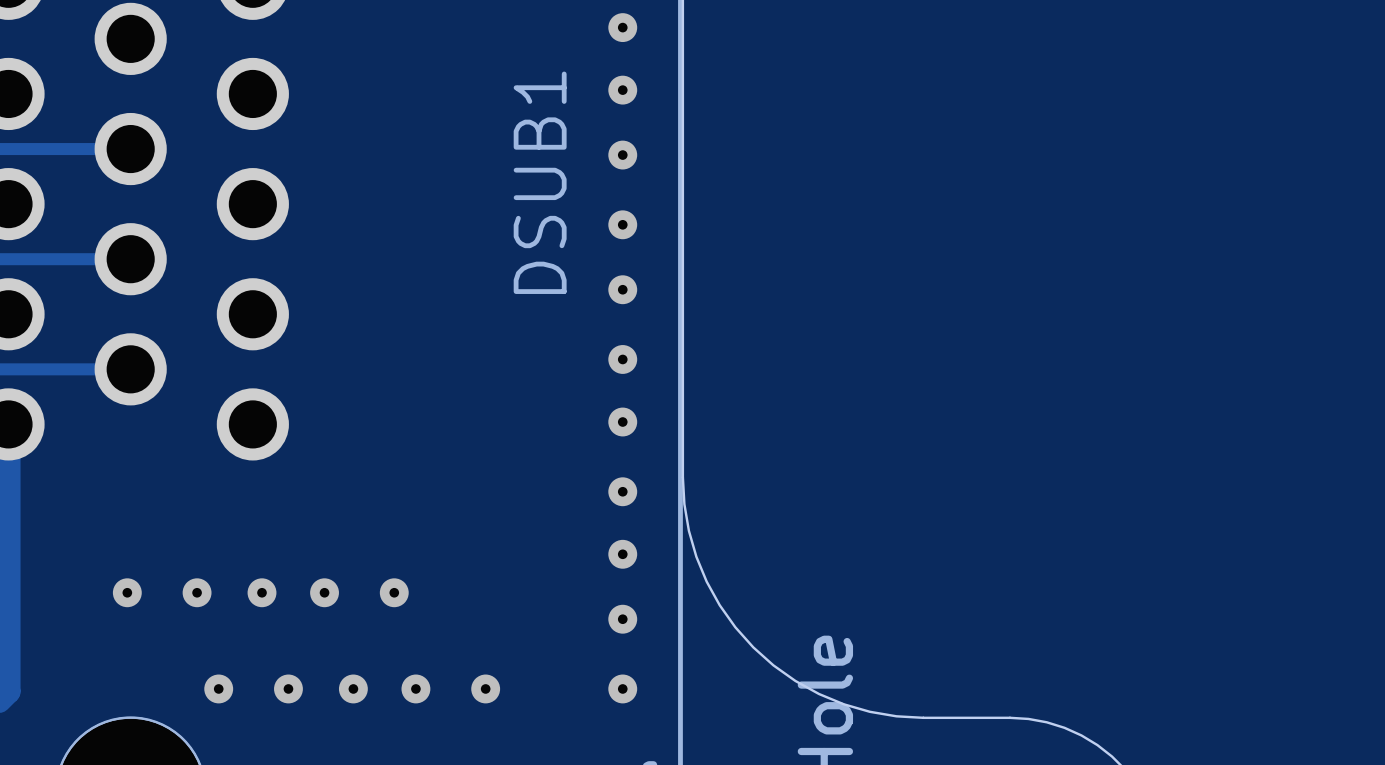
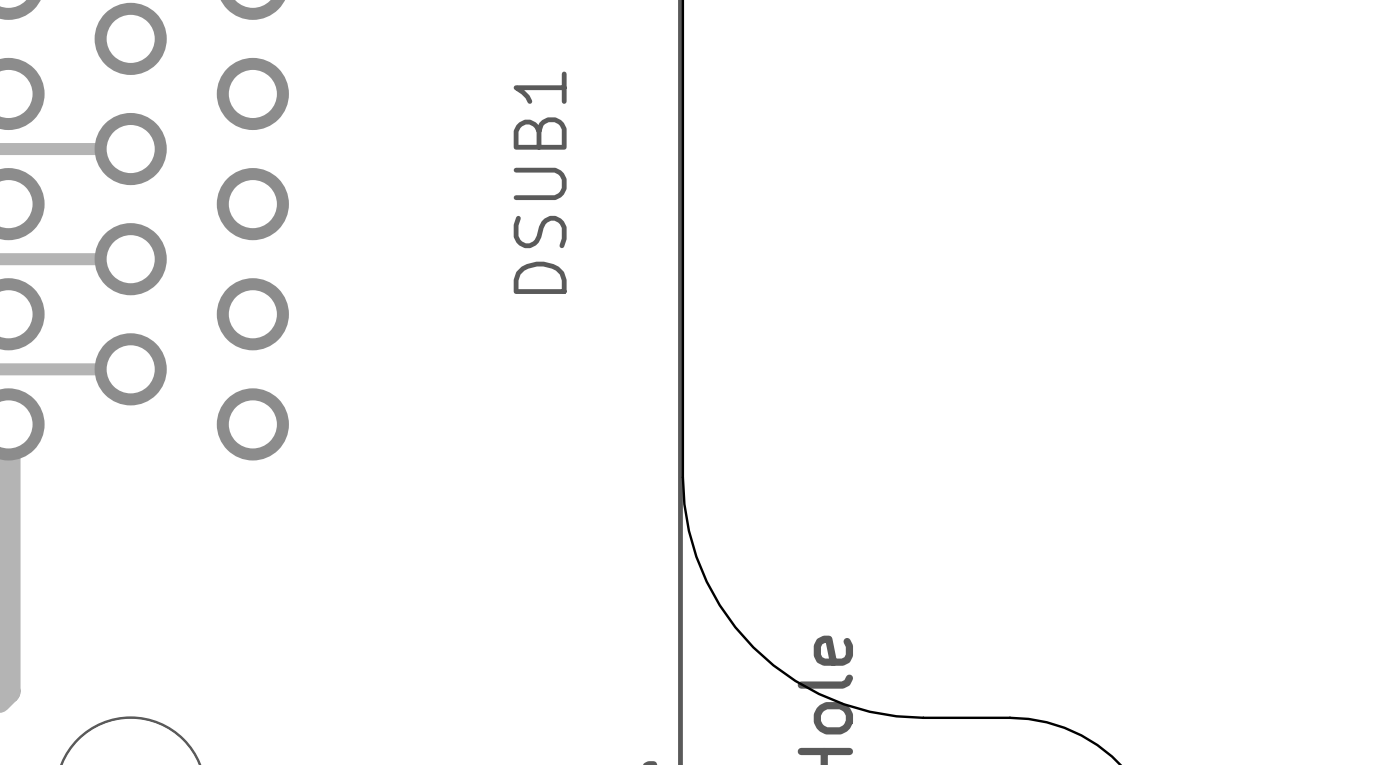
via: (622, 27) -> none
via: (622, 90) -> none
via: (622, 155) -> none
via: (622, 224) -> none
via: (622, 289) -> none
via: (622, 359) -> none
via: (622, 422) -> none
via: (622, 491) -> none
via: (622, 554) -> none
via: (127, 592) -> none
via: (197, 592) -> none
via: (262, 592) -> none
via: (324, 592) -> none
via: (394, 592) -> none
via: (622, 619) -> none
via: (218, 688) -> none
via: (288, 688) -> none
via: (353, 688) -> none
via: (415, 688) -> none
via: (485, 688) -> none
via: (622, 688) -> none

